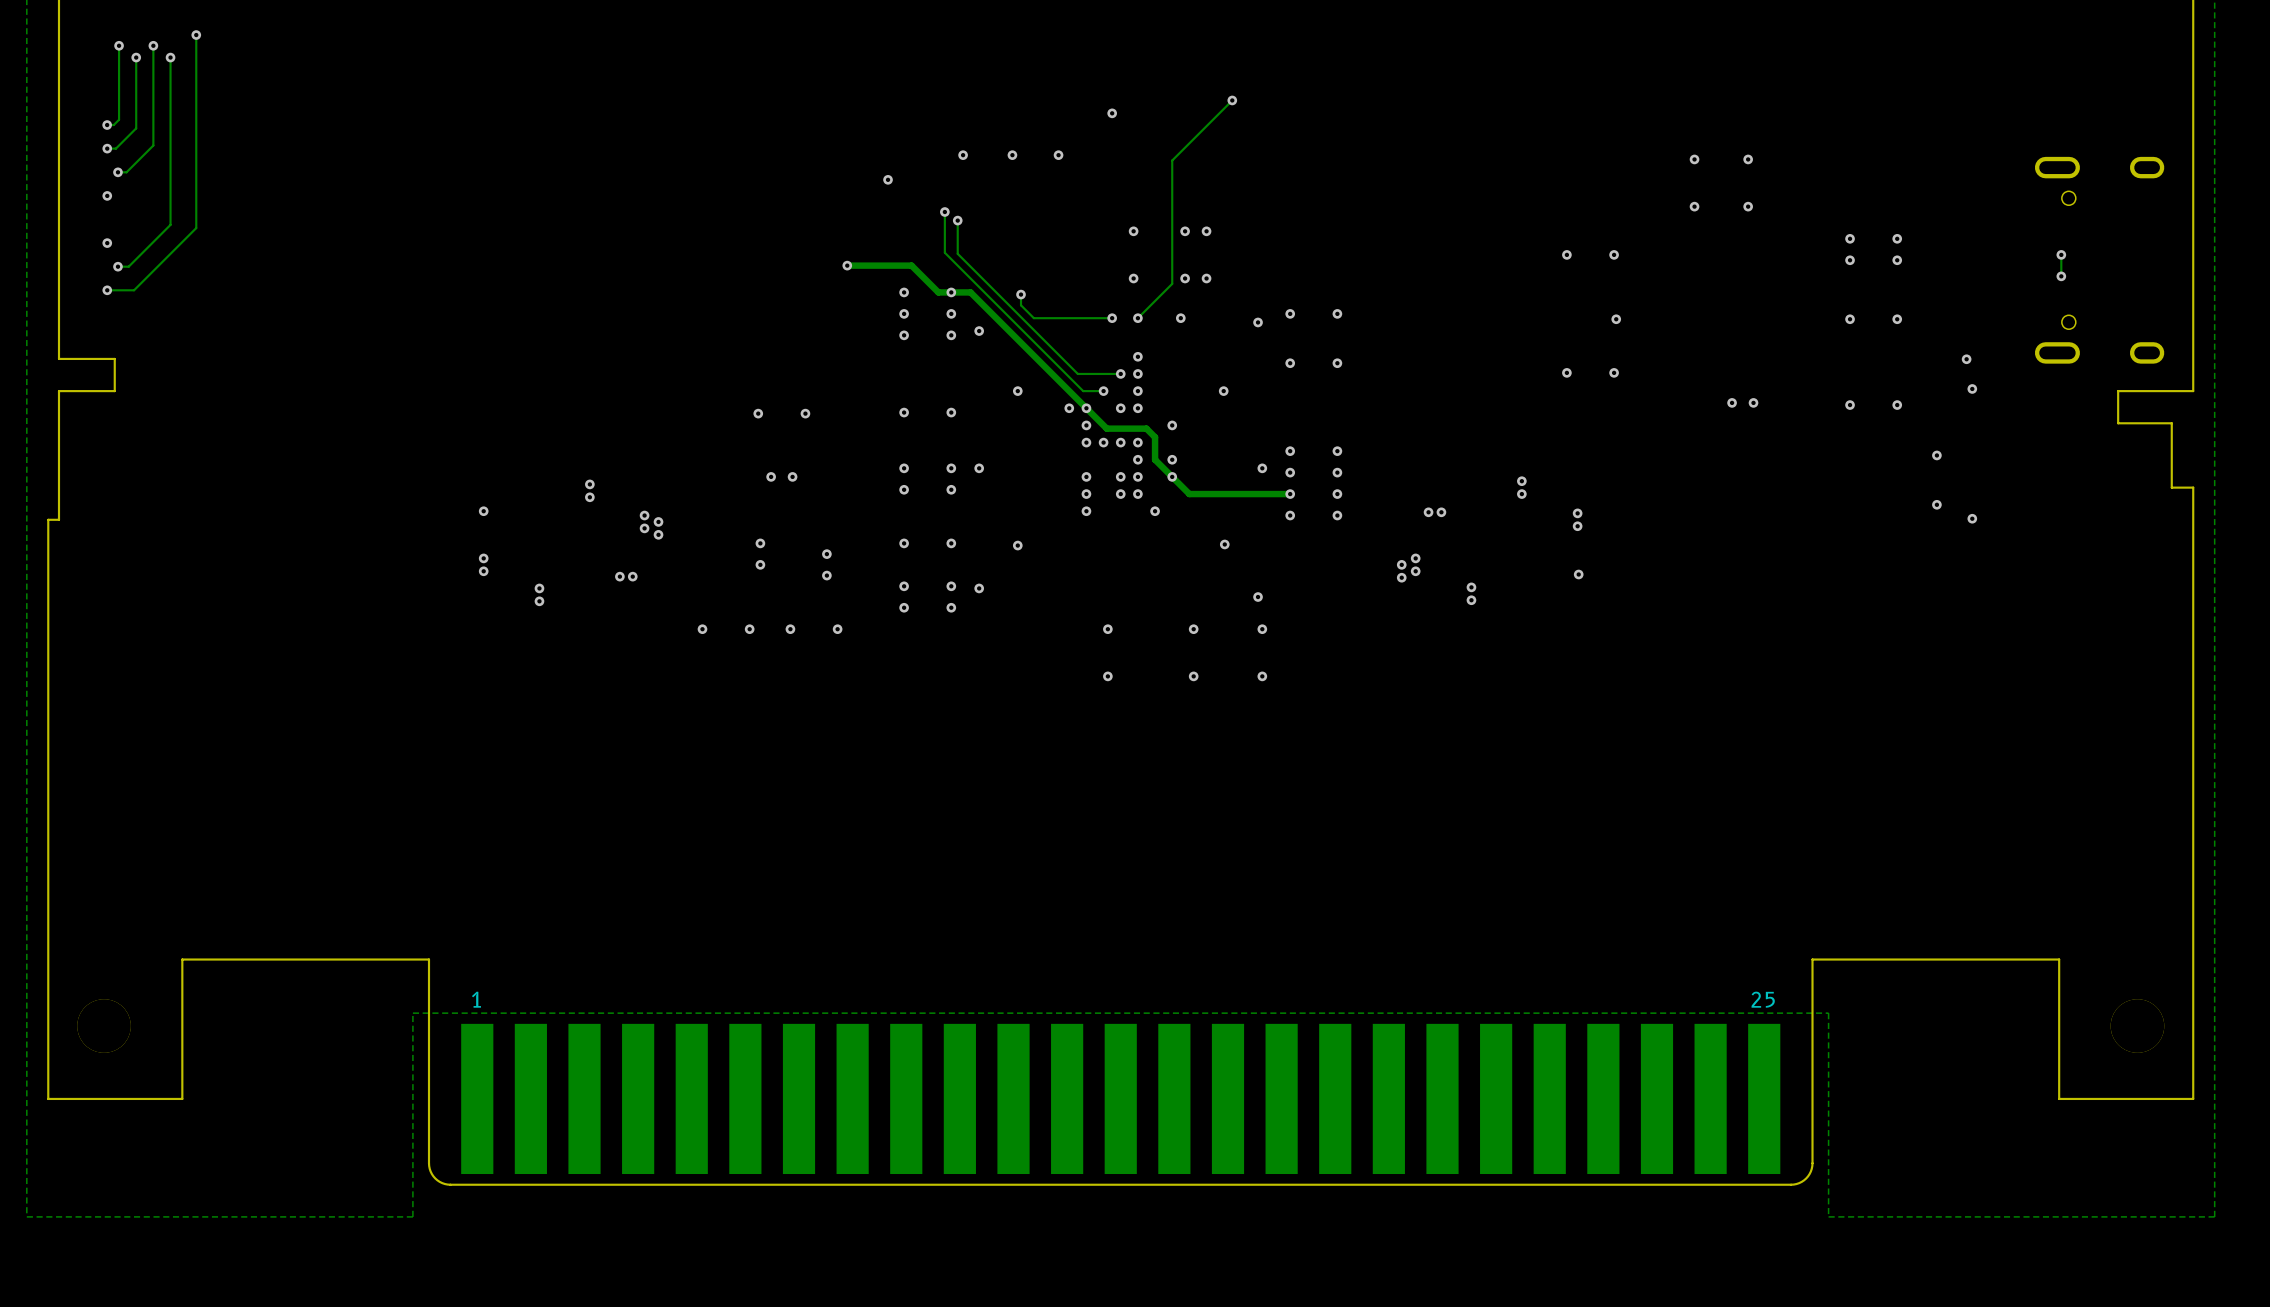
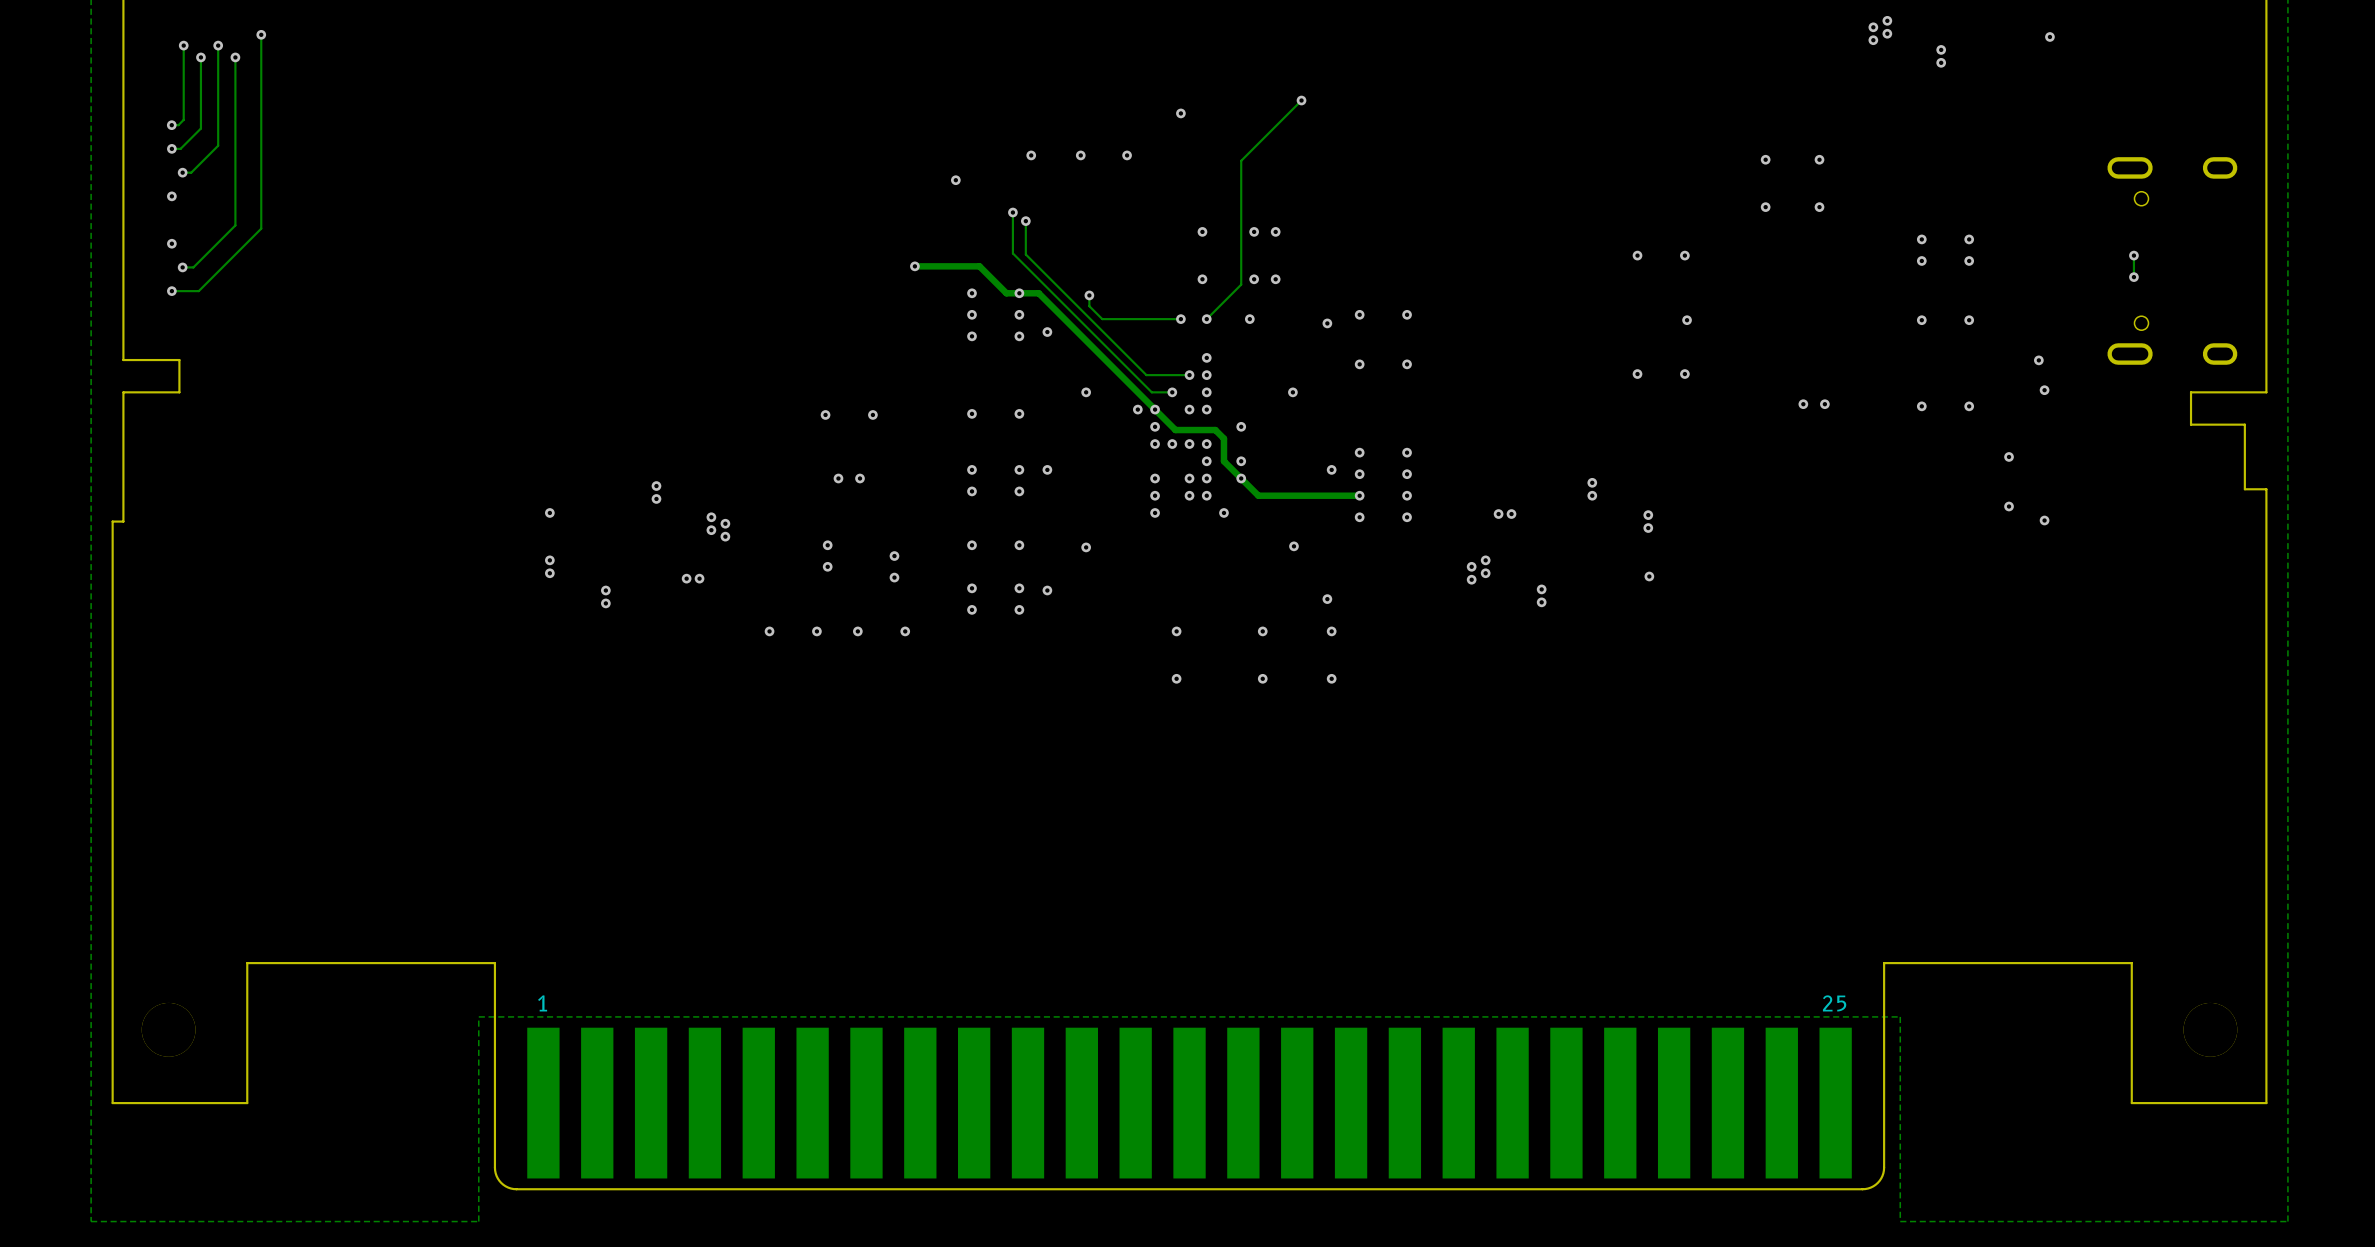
via: none -> (1887, 20)
via: none -> (1873, 27)
via: none -> (1887, 33)
via: none -> (2049, 36)
via: none -> (1873, 40)
via: none -> (1941, 49)
via: none -> (1941, 62)

